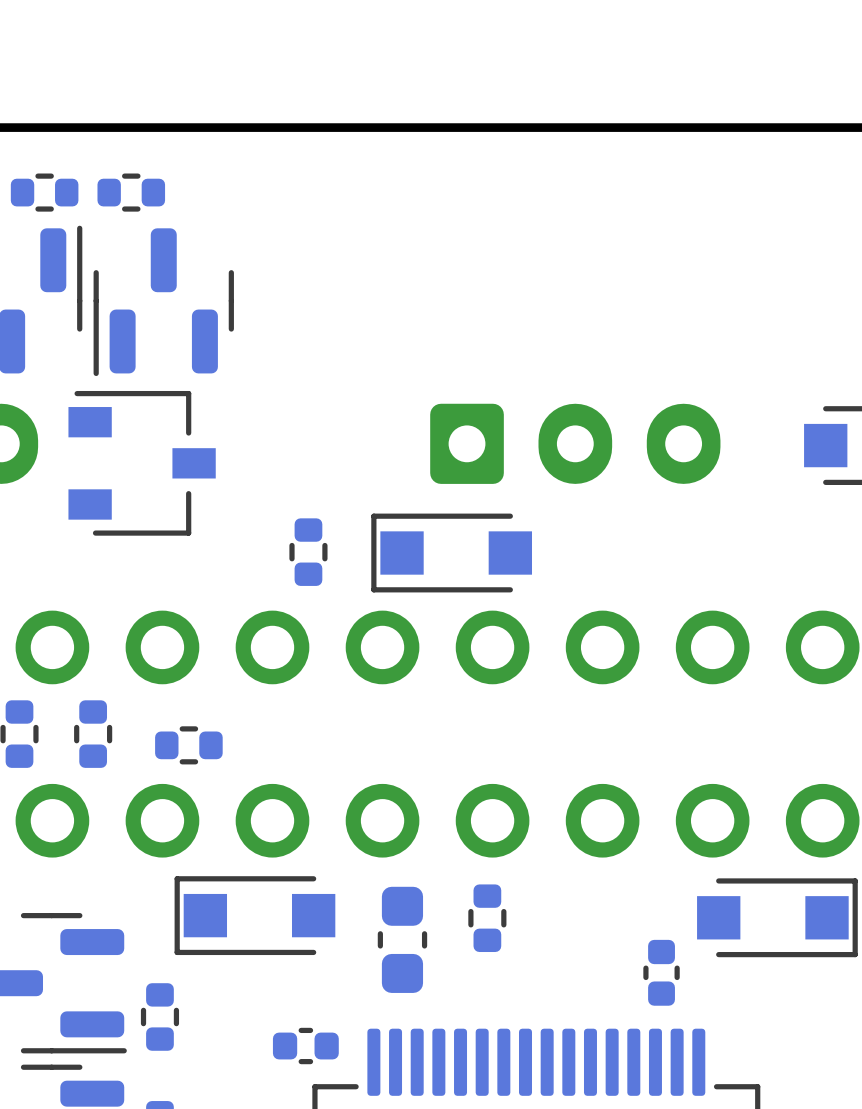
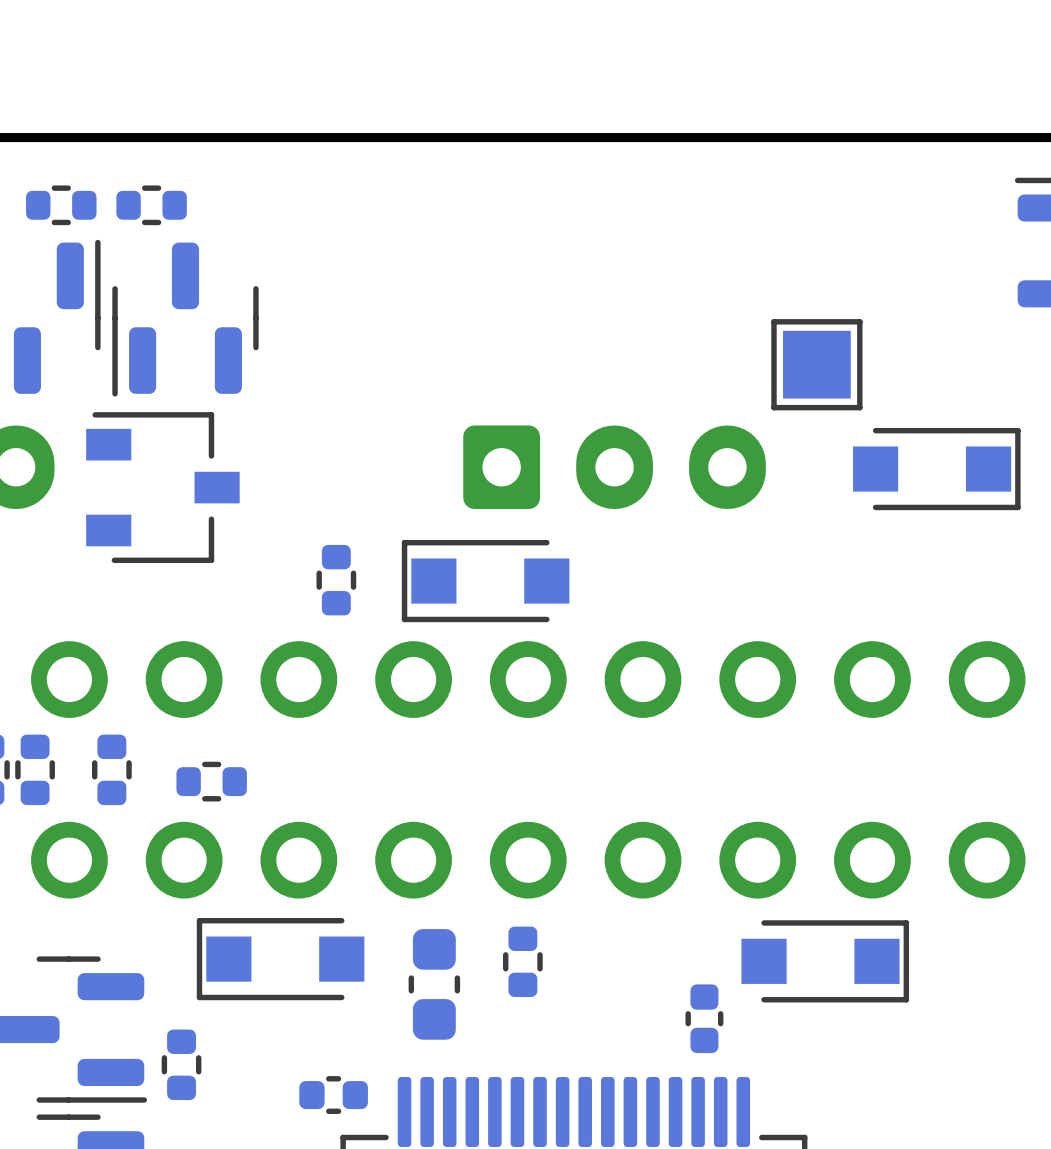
part: none -> (816, 364)

